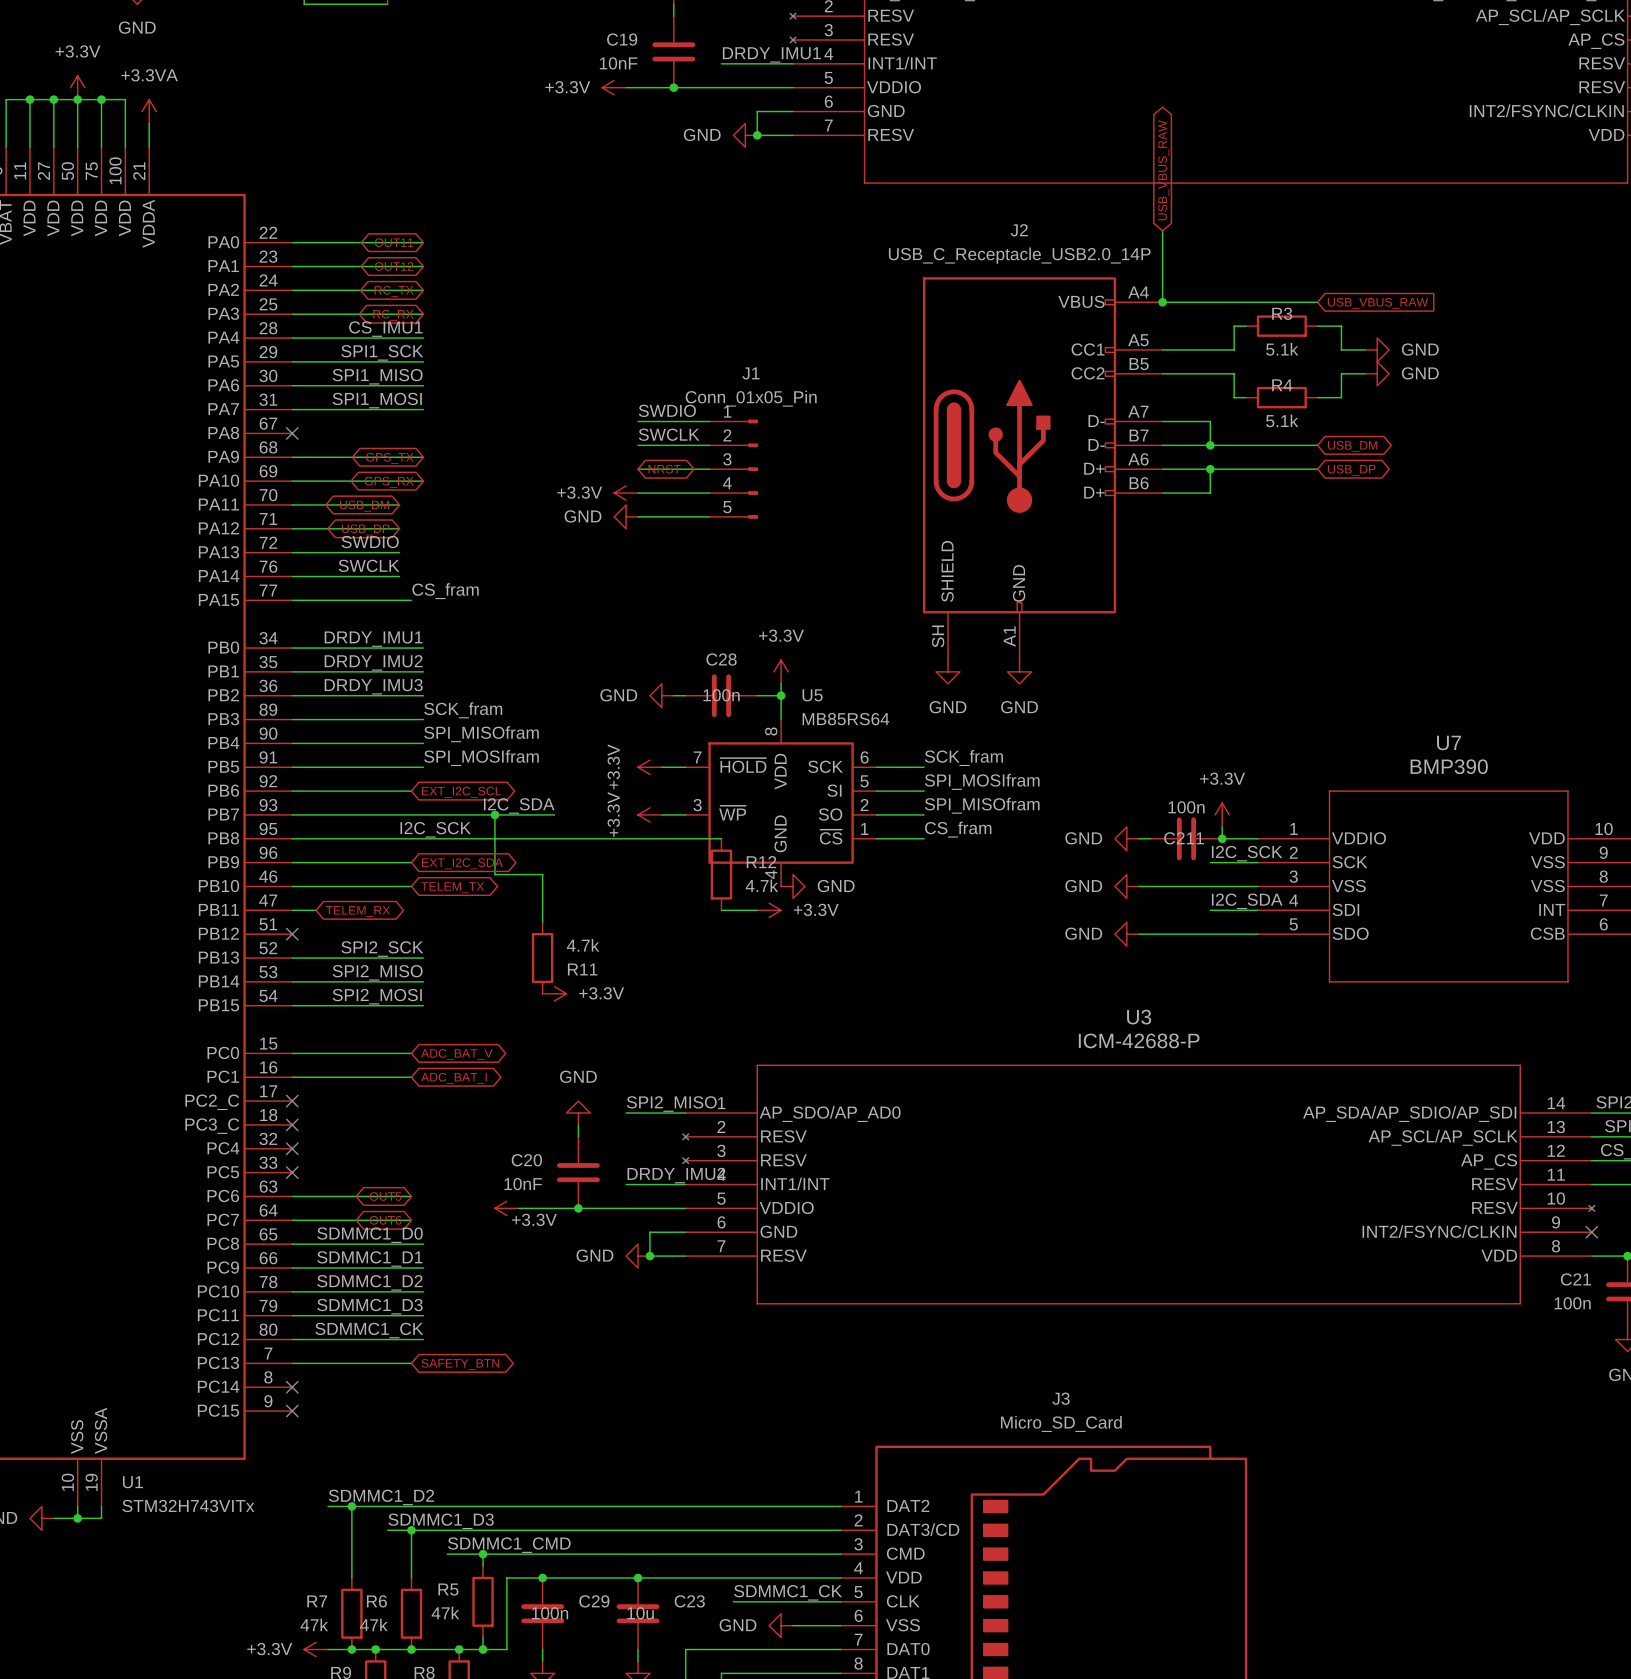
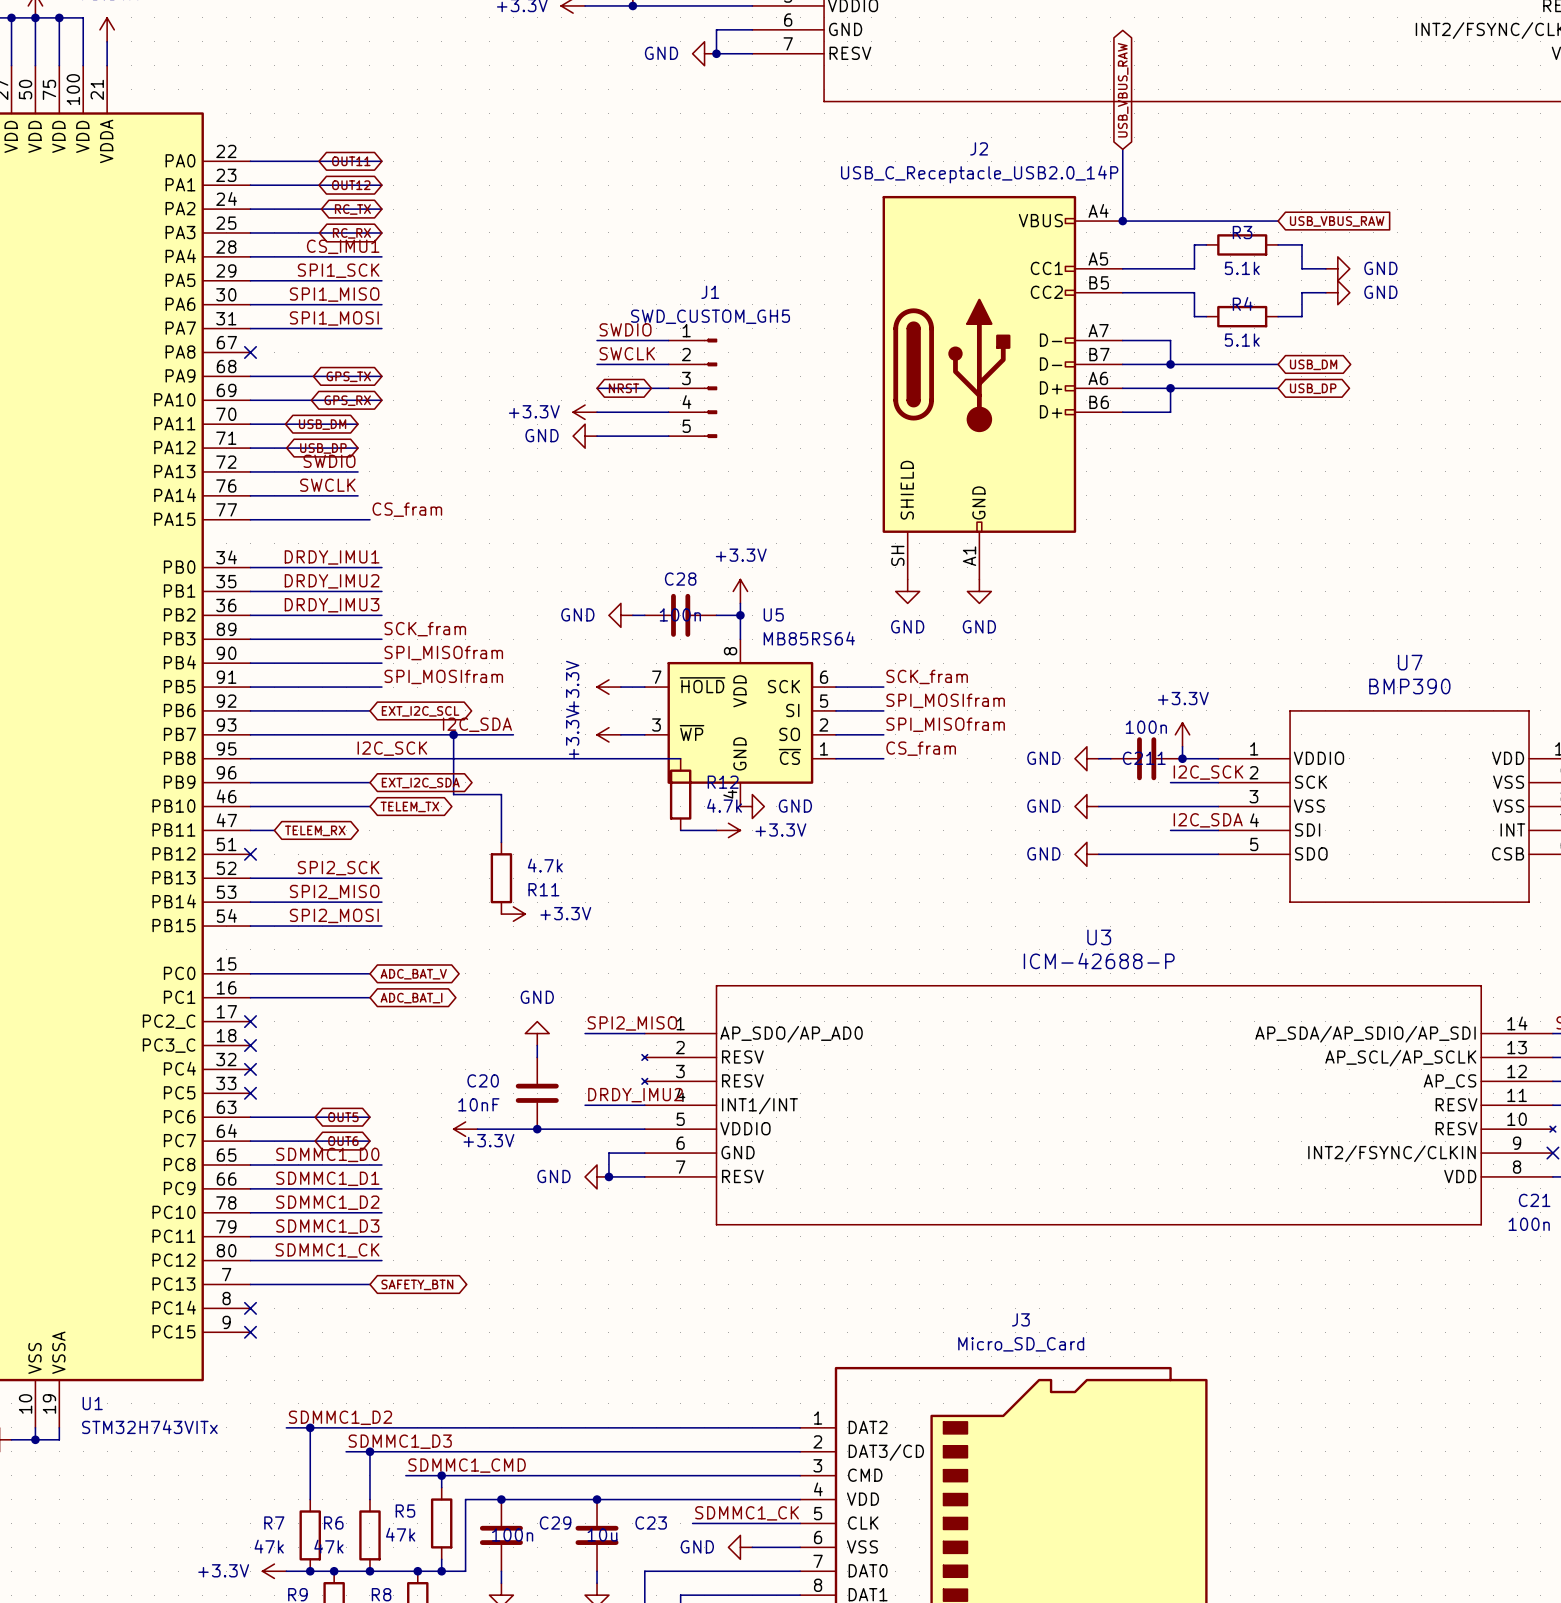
J1 value: Conn_01x05_Pin (751, 398) -> SWD_CUSTOM_GH5 (710, 316)

